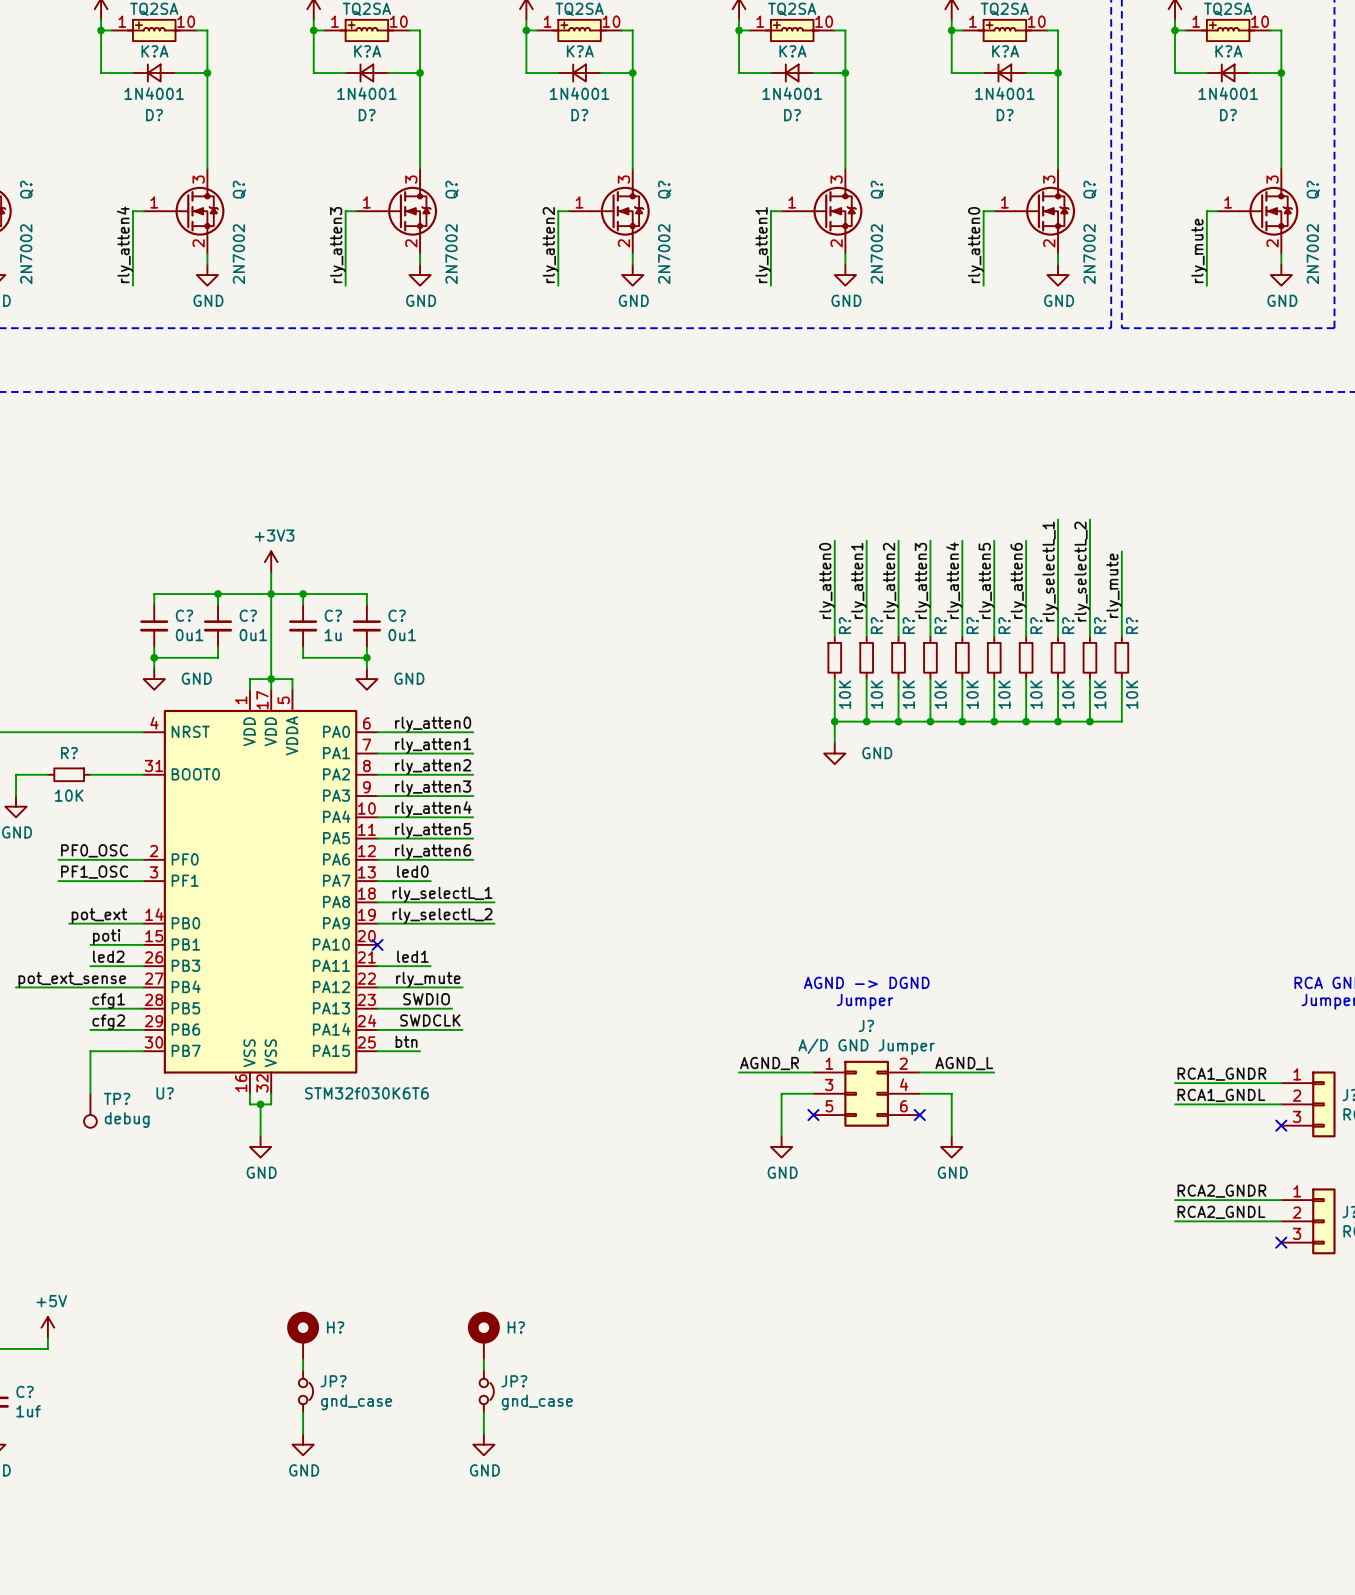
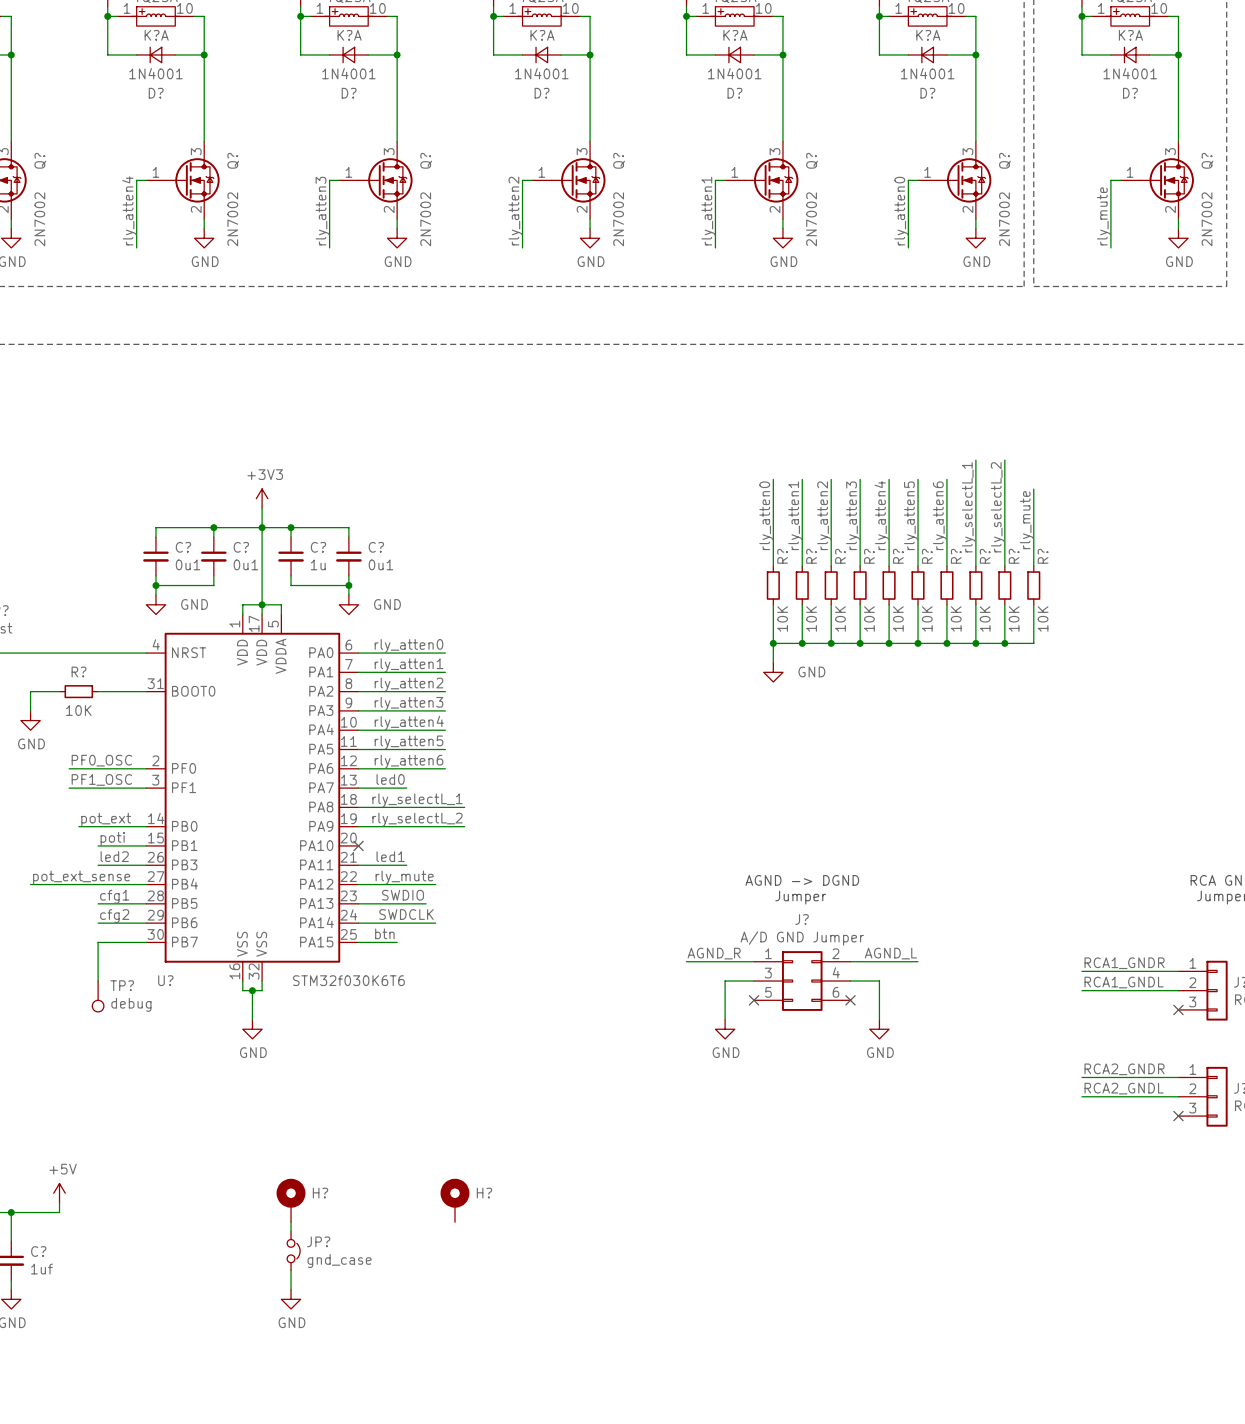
wire: (483, 1359) (483, 1370) -> none
JP?: gnd_case (486, 1391) -> none
wire: (483, 1412) (483, 1434) -> none
power symbol: GND (483, 1444) -> none

